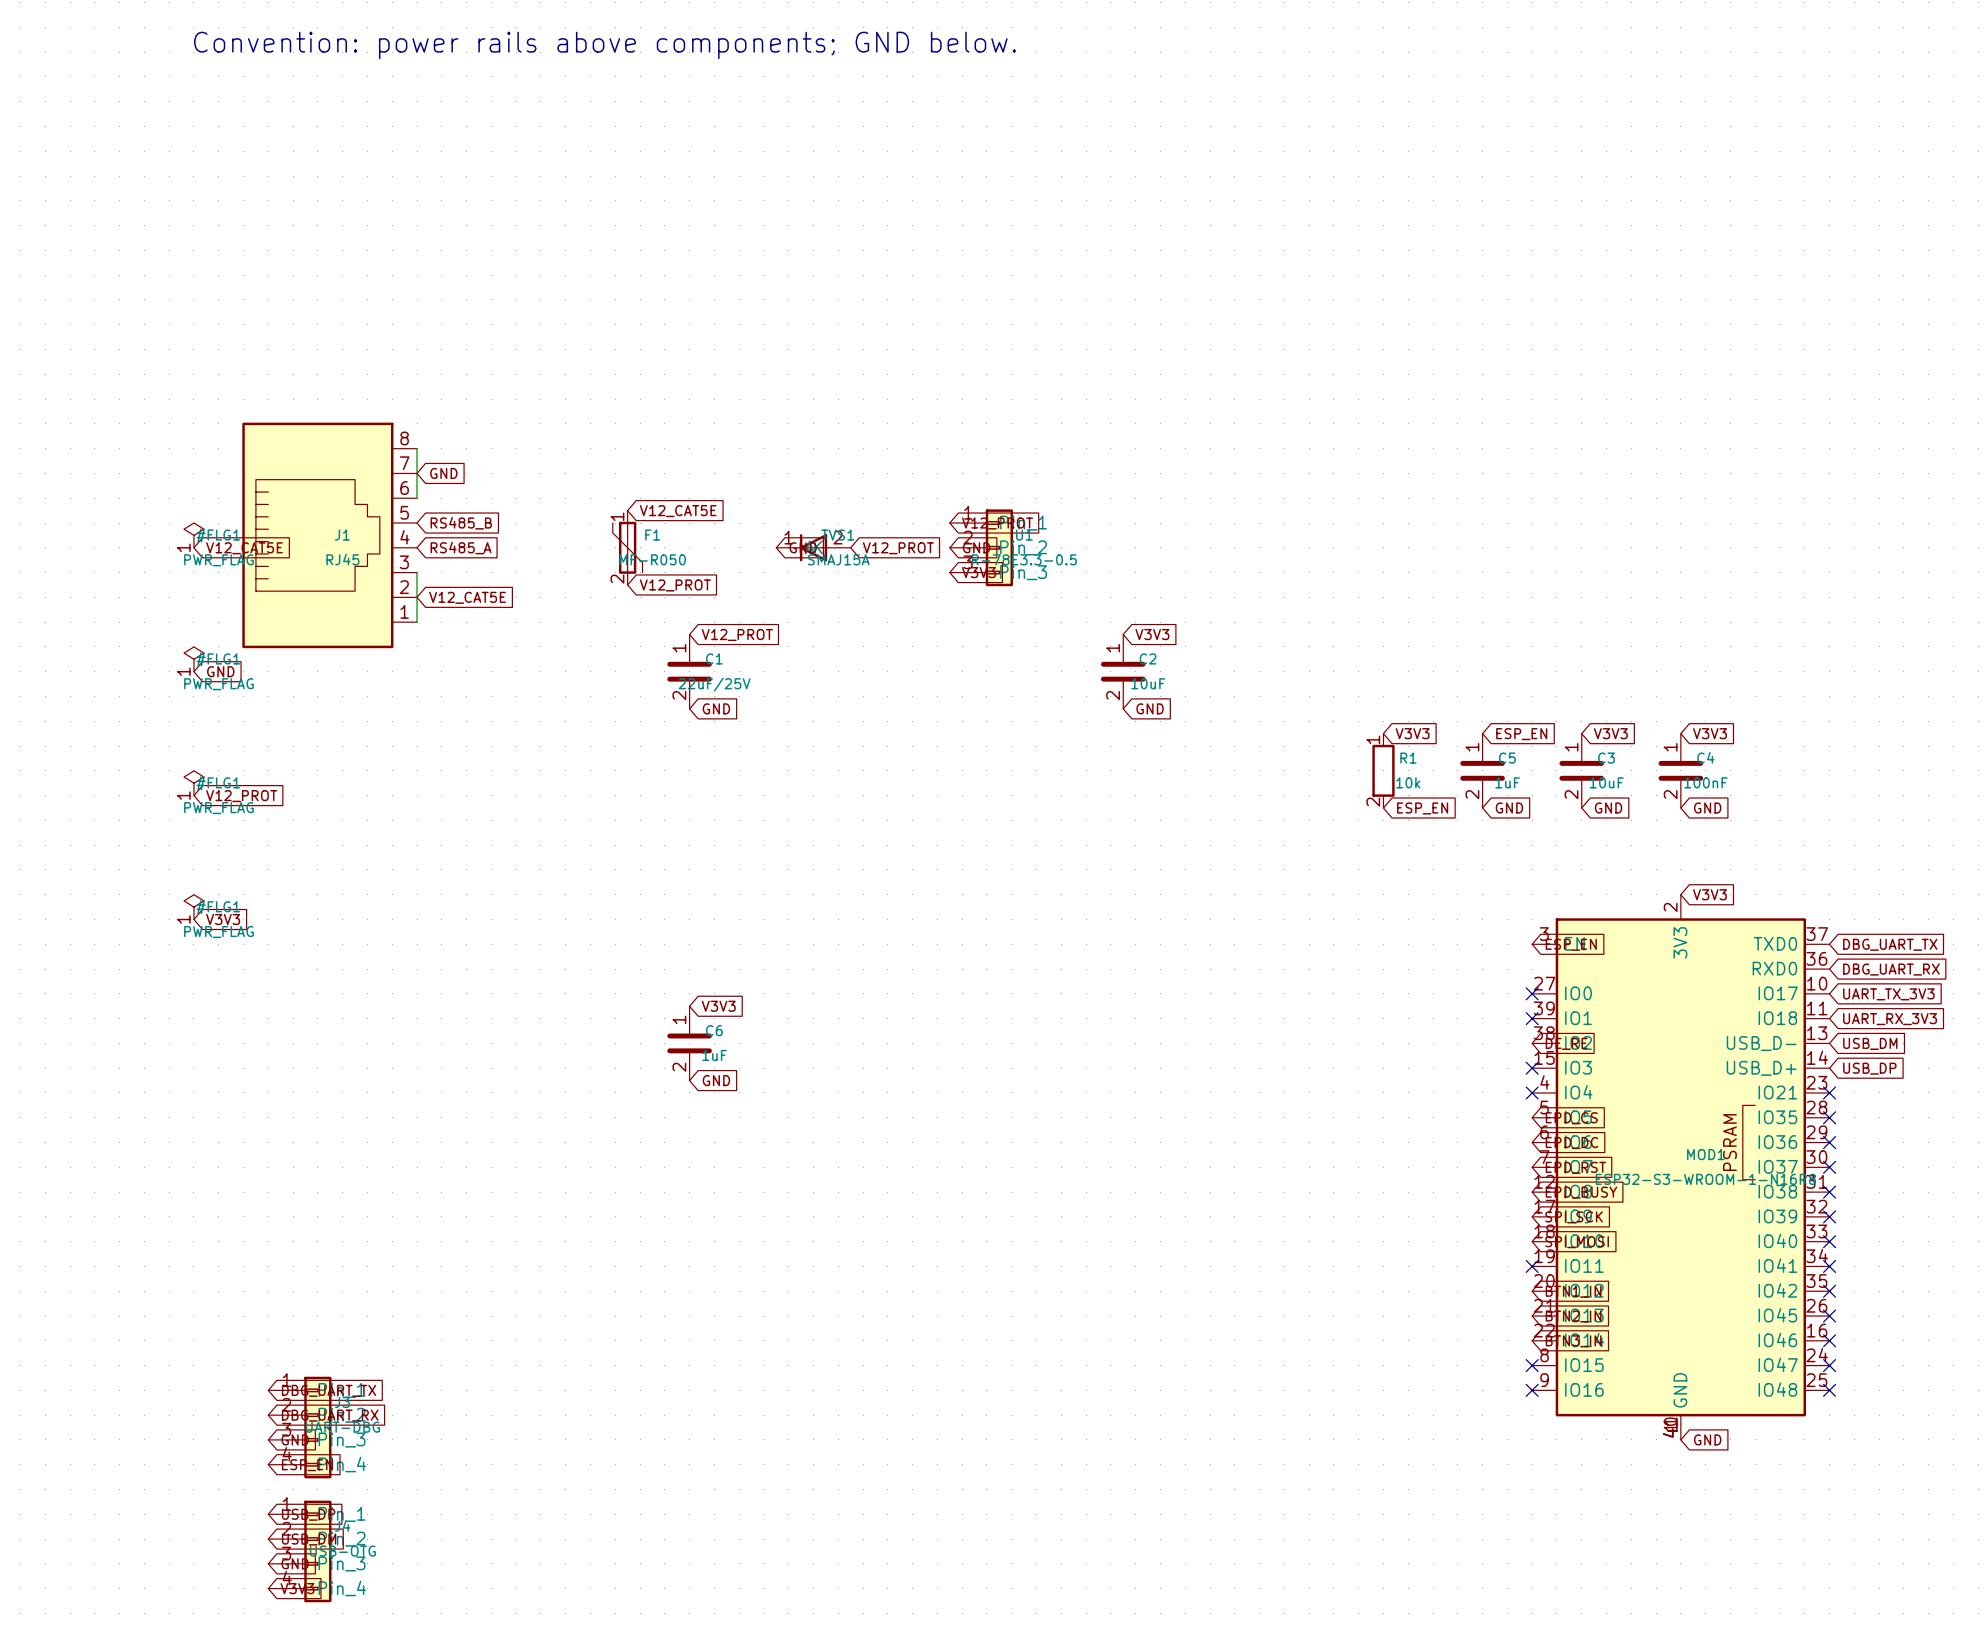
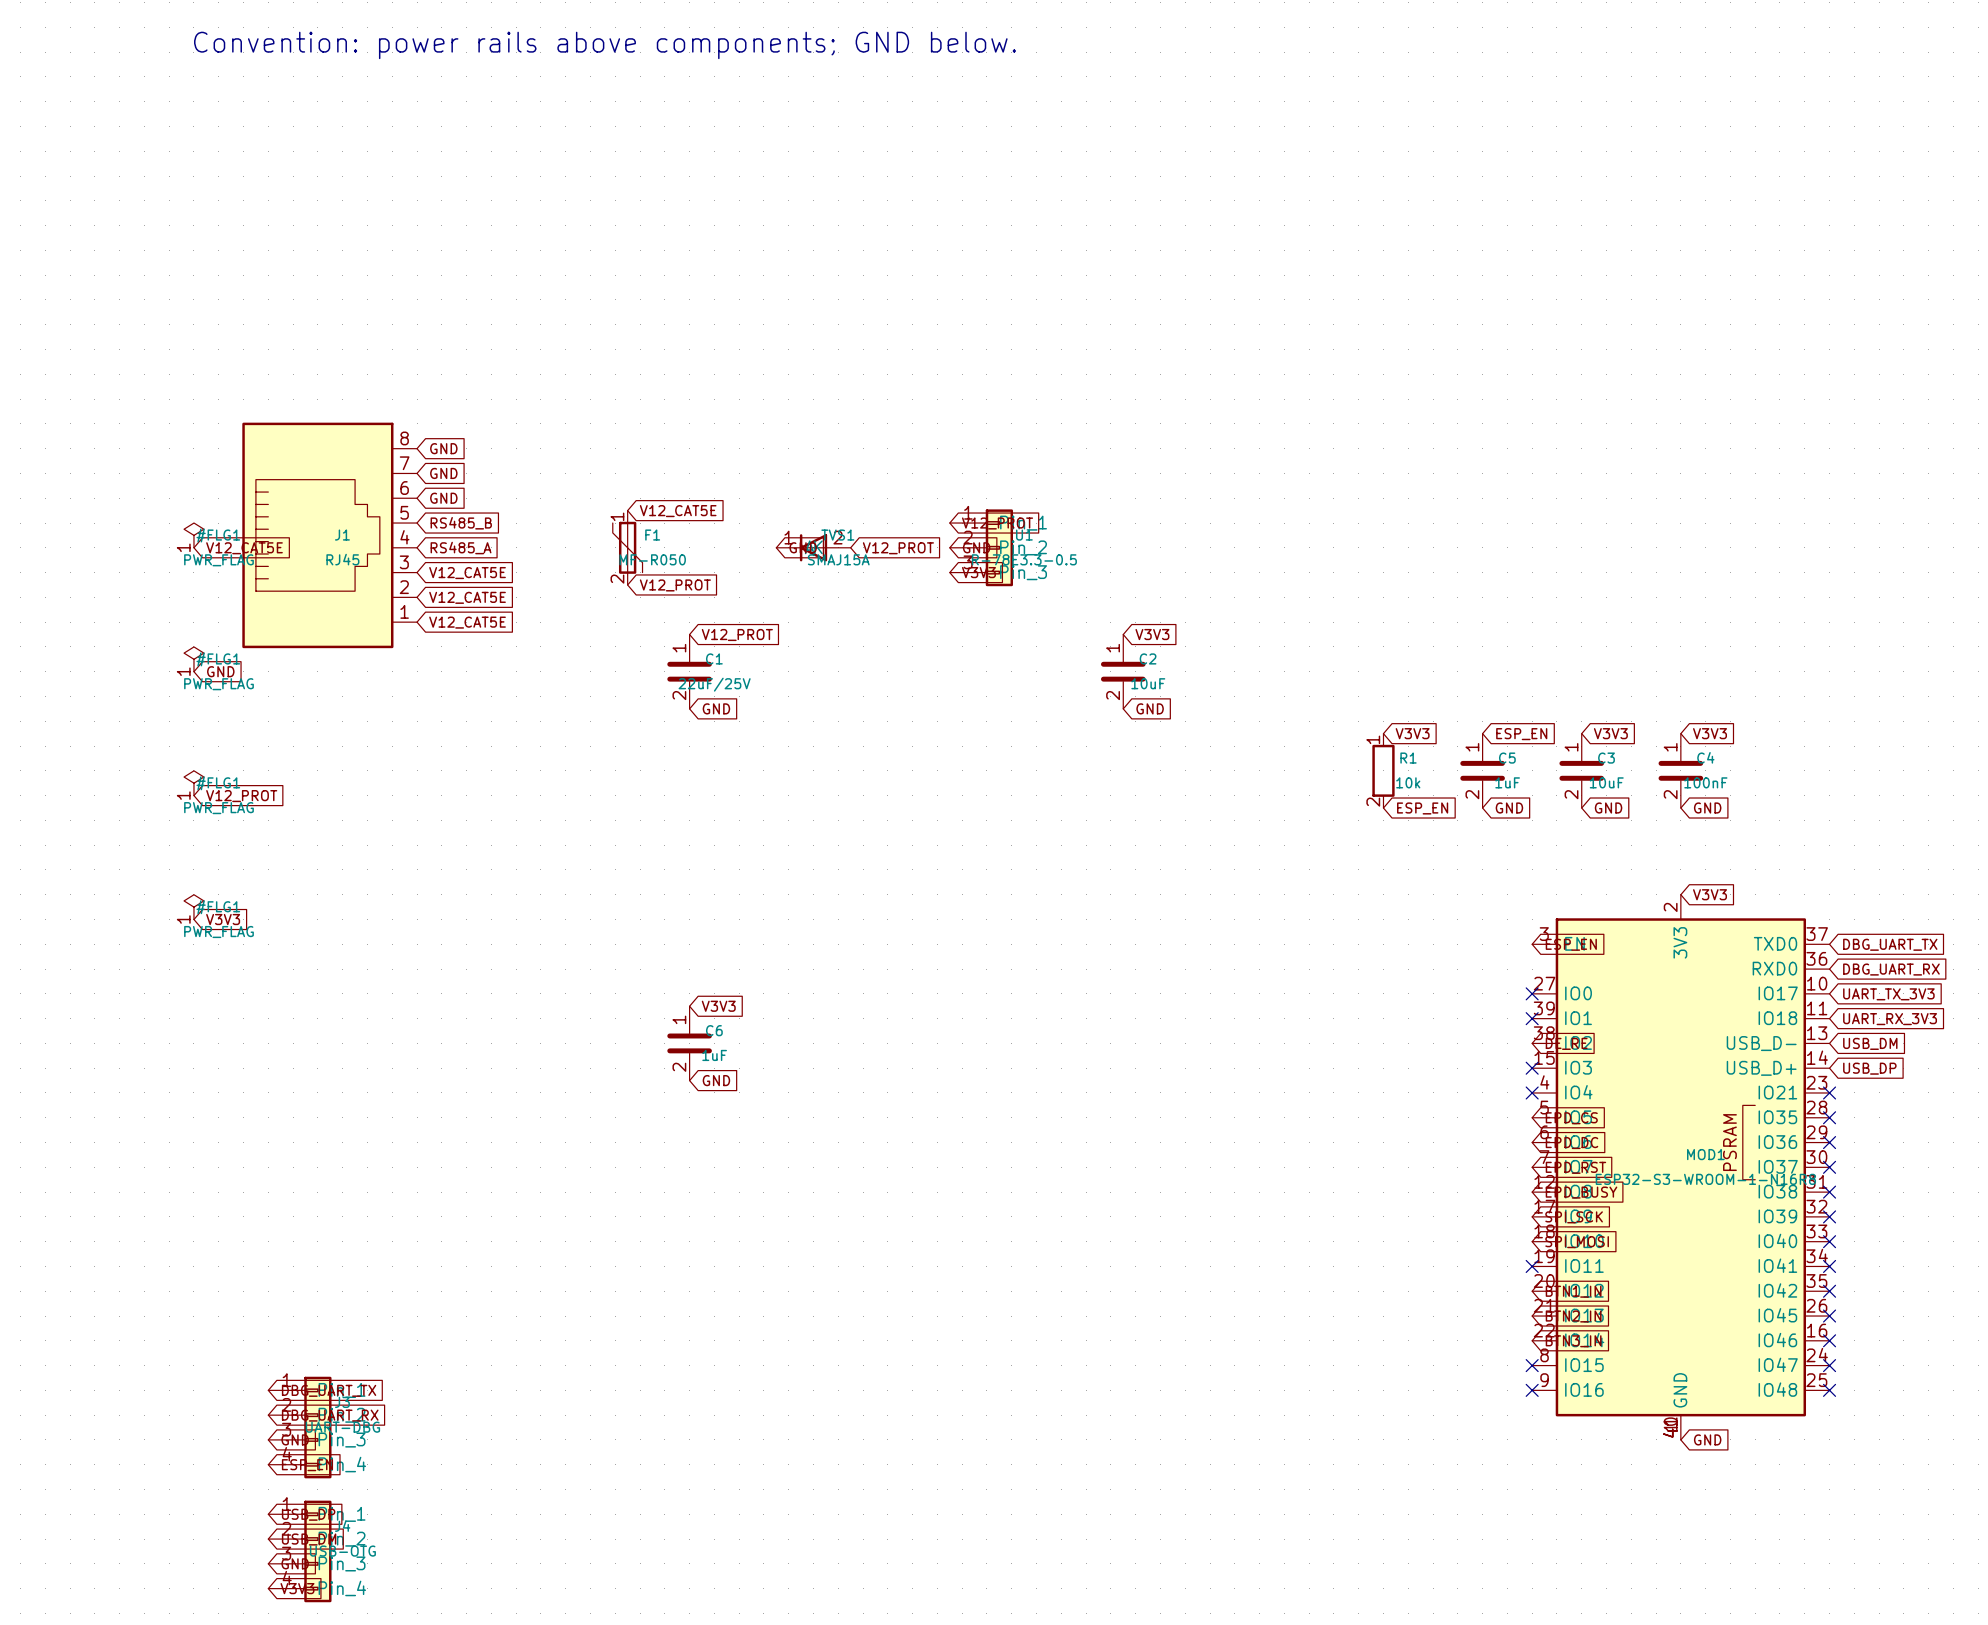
wire: (417, 448) (417, 498) -> none
global label: none -> GND (443, 448)
global label: none -> GND (443, 498)
wire: (417, 572) (417, 622) -> none
global label: none -> V12_CAT5E (467, 573)
global label: none -> V12_CAT5E (467, 622)

